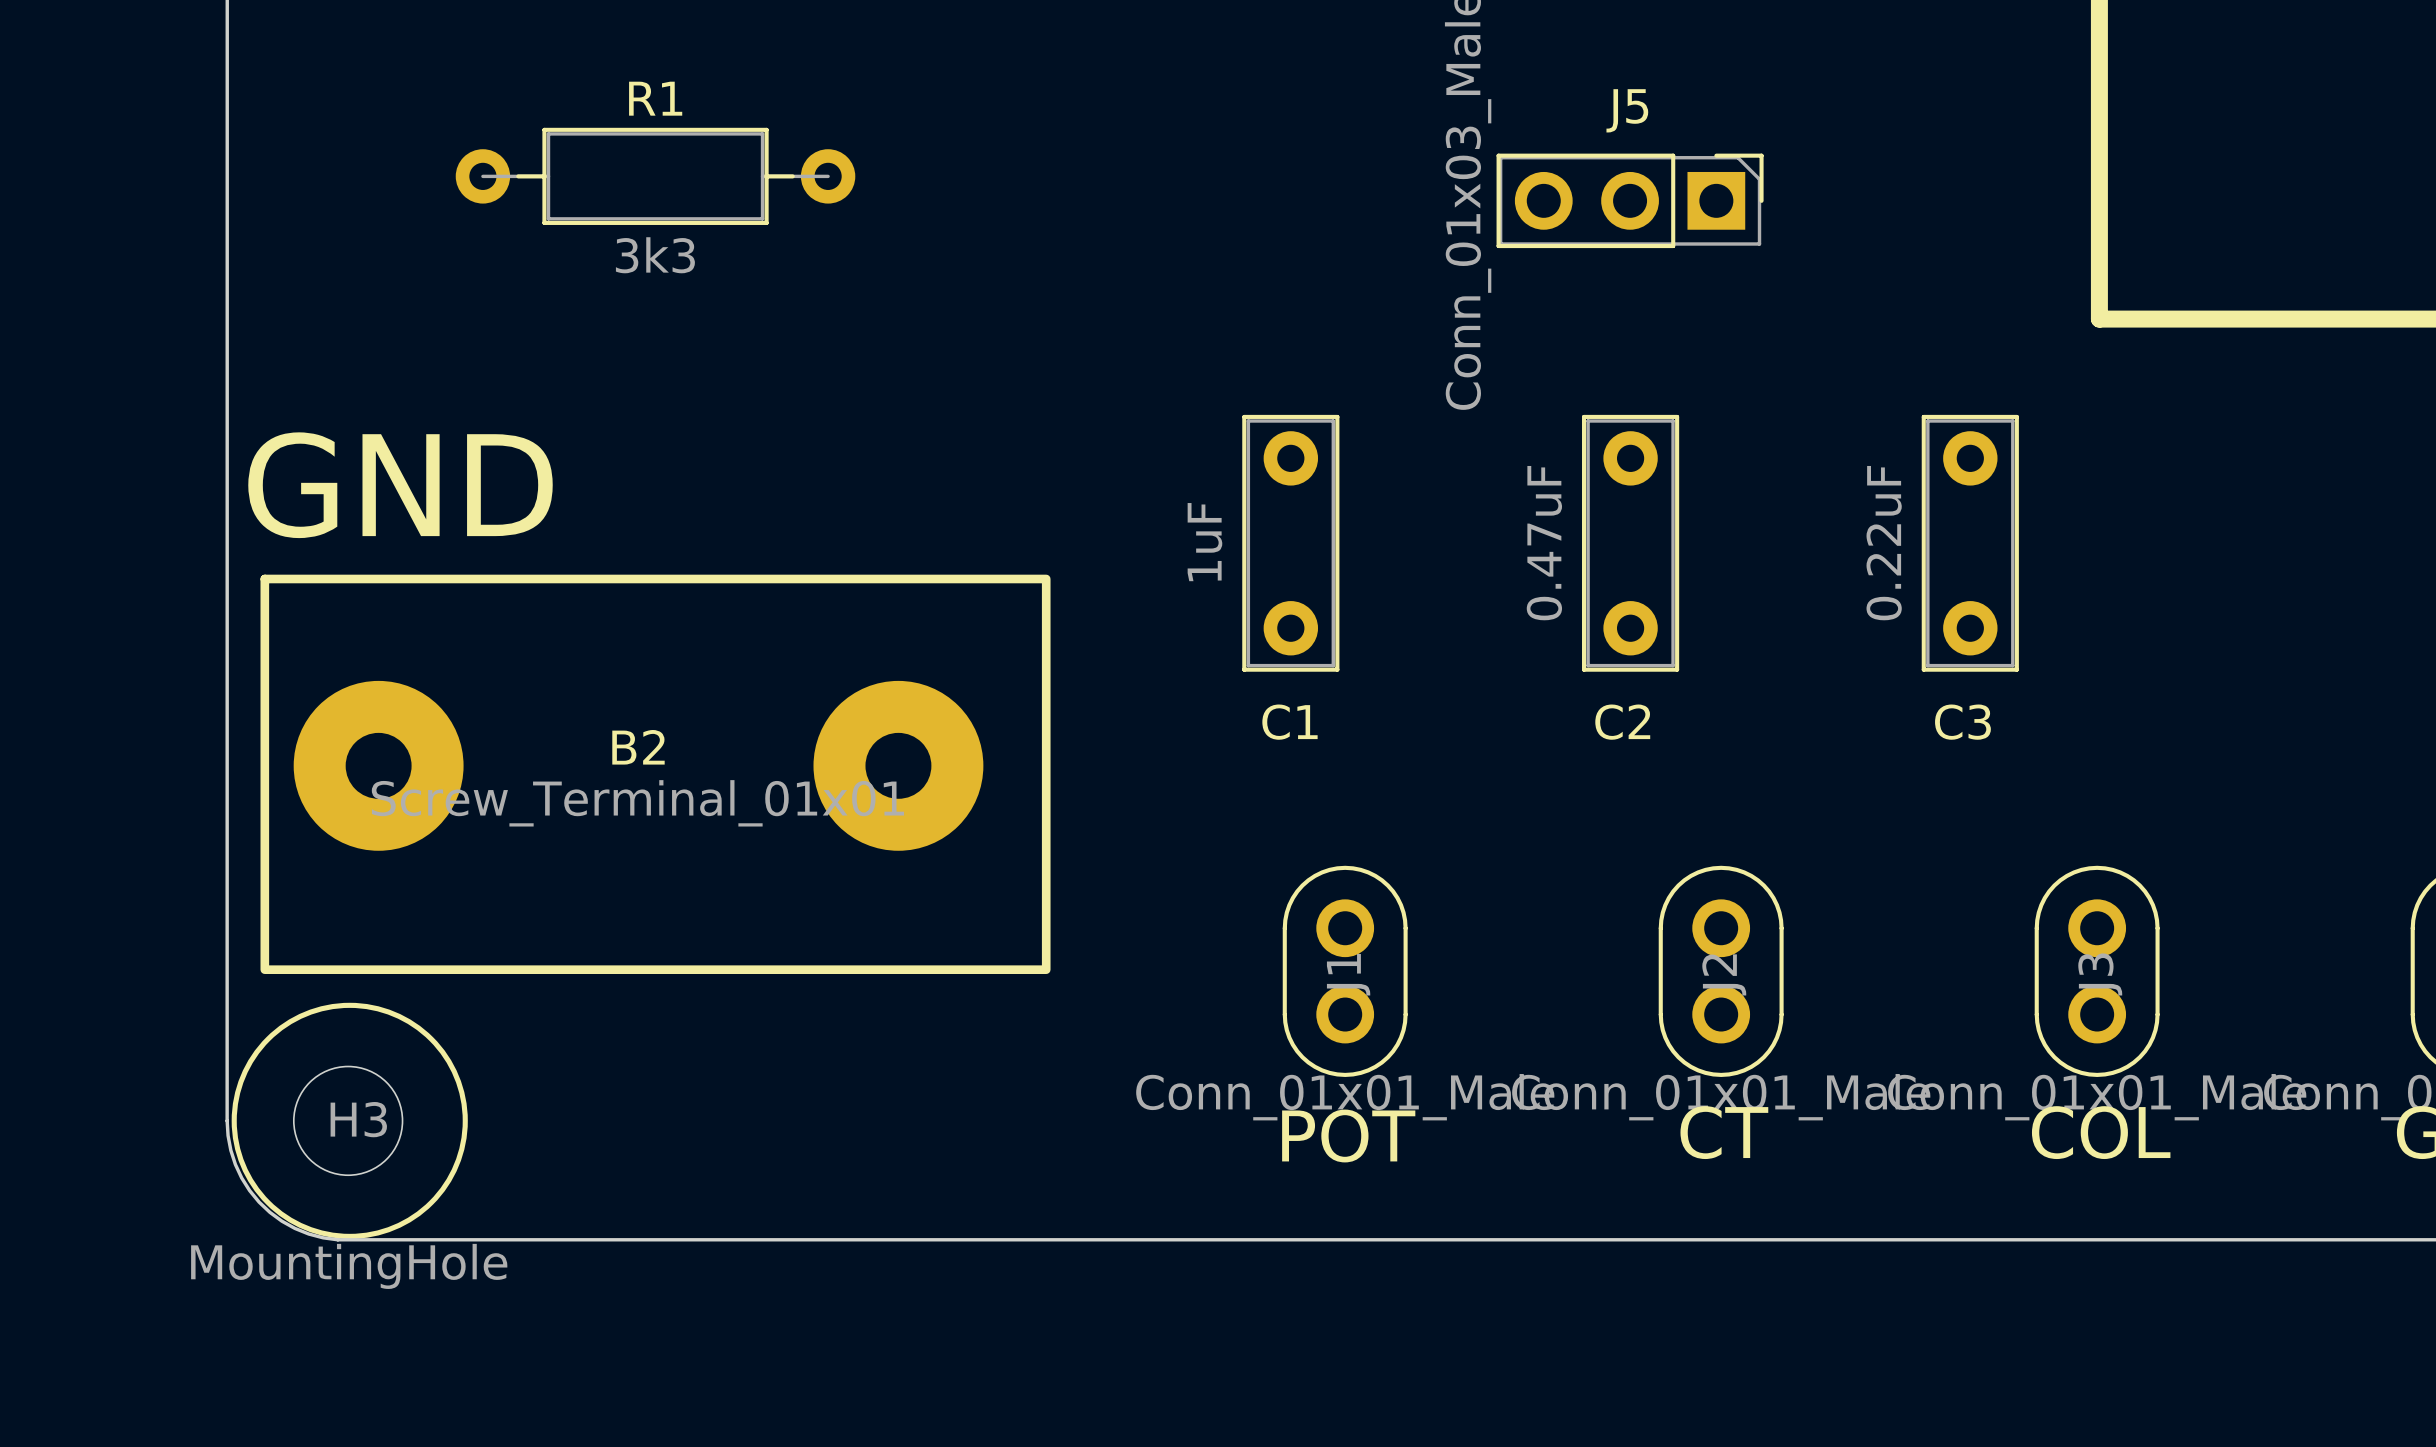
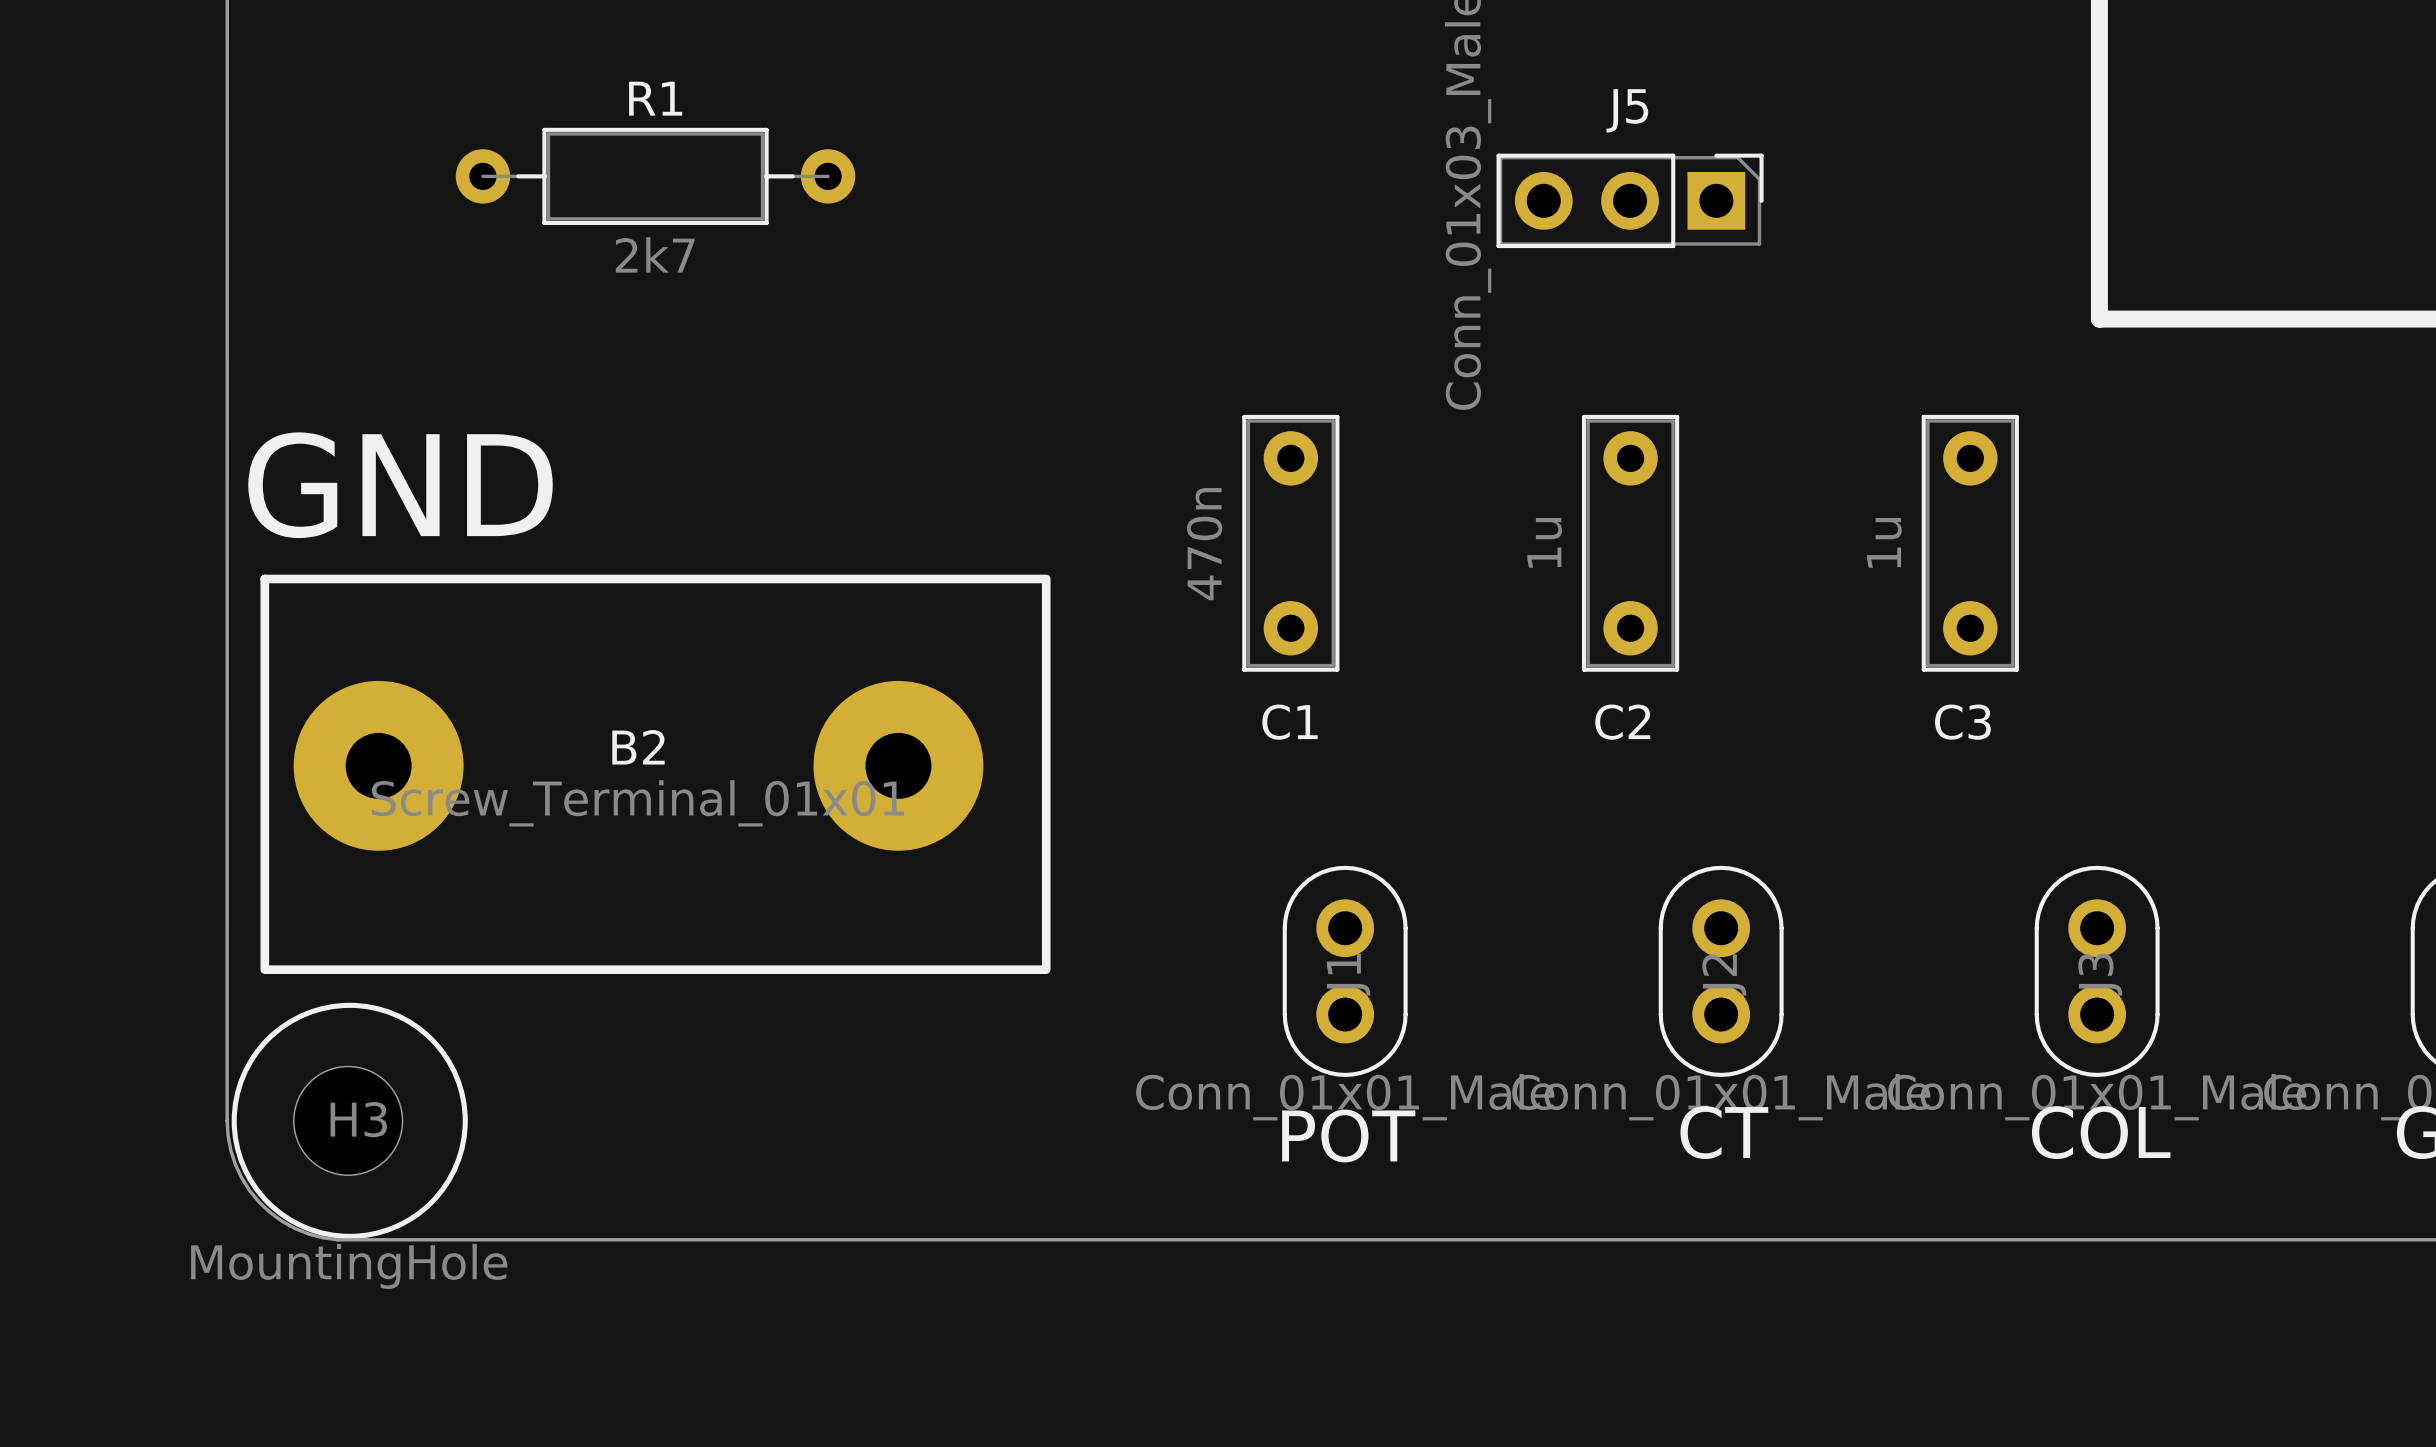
R1 value: 3k3 (655, 255) -> 2k7 (655, 254)
C1 value: 1uF (1204, 542) -> 470n (1204, 544)
C2 value: 0.47uF (1544, 543) -> 1u (1544, 542)
C3 value: 0.22uF (1884, 543) -> 1u (1884, 542)

